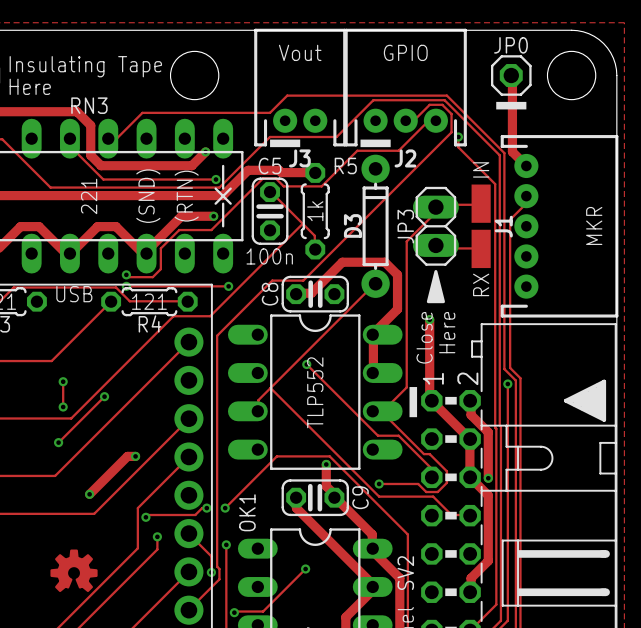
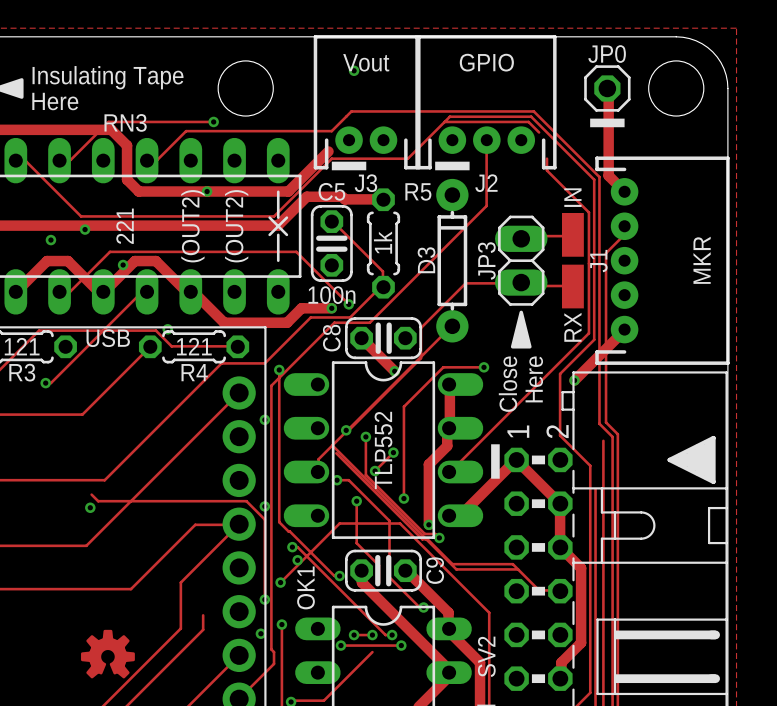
via: none -> (354, 70)
track: none -> (213, 121) (108, 121) (70, 160) (59, 160)
via: none -> (213, 121)
track: (429, 104) (414, 119) (405, 120) -> (514, 121) (444, 121)
track: (451, 114) (451, 132) (405, 178) -> (486, 140) (486, 205)
track: (435, 120) (428, 120) (398, 150) (357, 150) (321, 186) (283, 186) (275, 178) (263, 178) (211, 230) (179, 230) (160, 248) (160, 269) (152, 277) (128, 277) (126, 274) -> none
via: (458, 136) -> none
track: (70, 139) (70, 146) (103, 179) (215, 179) -> none
track: (205, 151) (191, 165) -> (328, 151) (288, 191) (242, 191)
via: (205, 151) -> none
via: none -> (207, 191)
via: (215, 179) -> none
text: (SND) (148, 196) -> (OUT2) (192, 226)
text: (RTN) (186, 196) -> (OUT2) (236, 226)
via: none -> (85, 229)
track: (435, 207) (435, 212) (406, 241) (406, 387) (382, 411) (372, 411) -> none
via: none -> (50, 240)
track: (213, 216) (181, 216) (148, 249) (146, 253) -> (331, 308) (301, 308) (287, 322) (224, 322) (195, 293) (190, 291)
via: (213, 216) -> none
track: (302, 223) (210, 316) -> (383, 287) (381, 285) (350, 317) (310, 317) (263, 363)
via: none -> (123, 264)
track: none -> (521, 282) (465, 283) (421, 327) (421, 358) (348, 430) (346, 430)
track: none -> (59, 291) (70, 291) (109, 251) (296, 251) (348, 304)
track: none -> (147, 291) (141, 292) (50, 383) (45, 383)
via: none -> (348, 304)
via: none -> (331, 308)
via: (126, 274) -> none
track: (126, 286) (228, 286) -> none
via: (228, 286) -> none
track: none -> (624, 329) (574, 380)
track: (495, 289) (496, 428) -> (588, 333) (449, 472)
track: (296, 294) (311, 293) (342, 262) (384, 262) (397, 274) (397, 309) (372, 334) -> (361, 338) (394, 371)
track: (499, 295) (500, 426) -> (594, 339) (560, 373) (560, 435) (590, 465) (590, 492)
track: none -> (483, 367) (443, 367) (403, 406) (403, 498)
track: (429, 319) (429, 396) (431, 400) -> (449, 515) (460, 515) (516, 459)
via position: (429, 319) -> (483, 367)
track: none -> (279, 369) (279, 522) (334, 576) (339, 576)
via: none -> (279, 369)
via: none -> (394, 371)
via: none -> (574, 380)
via: none -> (45, 383)
track: (306, 364) (378, 435) (398, 435) (430, 467) (431, 477) -> none
via: (306, 364) -> none
via: none -> (264, 419)
track: none -> (449, 428) (447, 446) (428, 464) (428, 524)
via: none -> (346, 430)
track: none -> (365, 436) (365, 474) (424, 534) (435, 534) (439, 537)
via: none -> (365, 436)
track: (63, 381) (63, 407) -> none
via: (63, 381) -> none
via: (507, 384) -> none
track: none -> (393, 452) (375, 471)
via: none -> (393, 452)
track: (104, 396) (58, 442) -> none
via: (104, 396) -> none
track: (470, 400) (471, 415) (488, 432) (488, 478) -> none
via: (63, 407) -> none
via: none -> (375, 471)
track: (373, 411) (381, 411) (423, 454) (429, 454) (446, 471) (446, 482) (437, 492) (428, 492) -> (518, 569) (512, 564)
track: none -> (337, 480) (348, 480) (389, 520) (389, 577) (419, 607) (423, 607)
via: none -> (337, 480)
track: (184, 423) (150, 457) -> (238, 524) (195, 524)
track: none -> (91, 494) (98, 501) (246, 501) (264, 519) (264, 599)
via: none -> (403, 498)
track: none -> (356, 501) (356, 543) (379, 565) (379, 582)
via: none -> (356, 501)
via: none -> (264, 506)
track: (135, 456) (127, 456) (89, 494) -> none
via: (135, 456) -> none
via: none -> (428, 524)
track: (326, 464) (326, 486) (333, 493) (334, 497) -> none
via: (326, 464) -> none
via: none -> (439, 537)
track: none -> (292, 547) (297, 547) (385, 635) (392, 635)
via: none -> (292, 547)
via: (488, 478) -> none
track: (379, 483) (418, 483) (426, 492) -> (336, 453) (422, 539) (427, 539) (452, 564) (510, 564)
via: (379, 483) -> none
via: none -> (297, 560)
via: (89, 494) -> none
via: none -> (339, 576)
track: (206, 508) (202, 508) (195, 515) (148, 515) (145, 517) -> none
via position: (206, 508) -> (264, 599)
via: (145, 517) -> none
via: none -> (423, 607)
track: (188, 533) (211, 556) (211, 572) -> none
via: (157, 536) -> none
track: none -> (354, 635) (372, 635)
via: none -> (354, 635)
via: none -> (372, 635)
via: none -> (392, 635)
track: none -> (340, 645) (401, 645)
via: none -> (340, 645)
via: none -> (401, 645)
via: (305, 569) -> none
via position: (211, 572) -> (260, 633)

